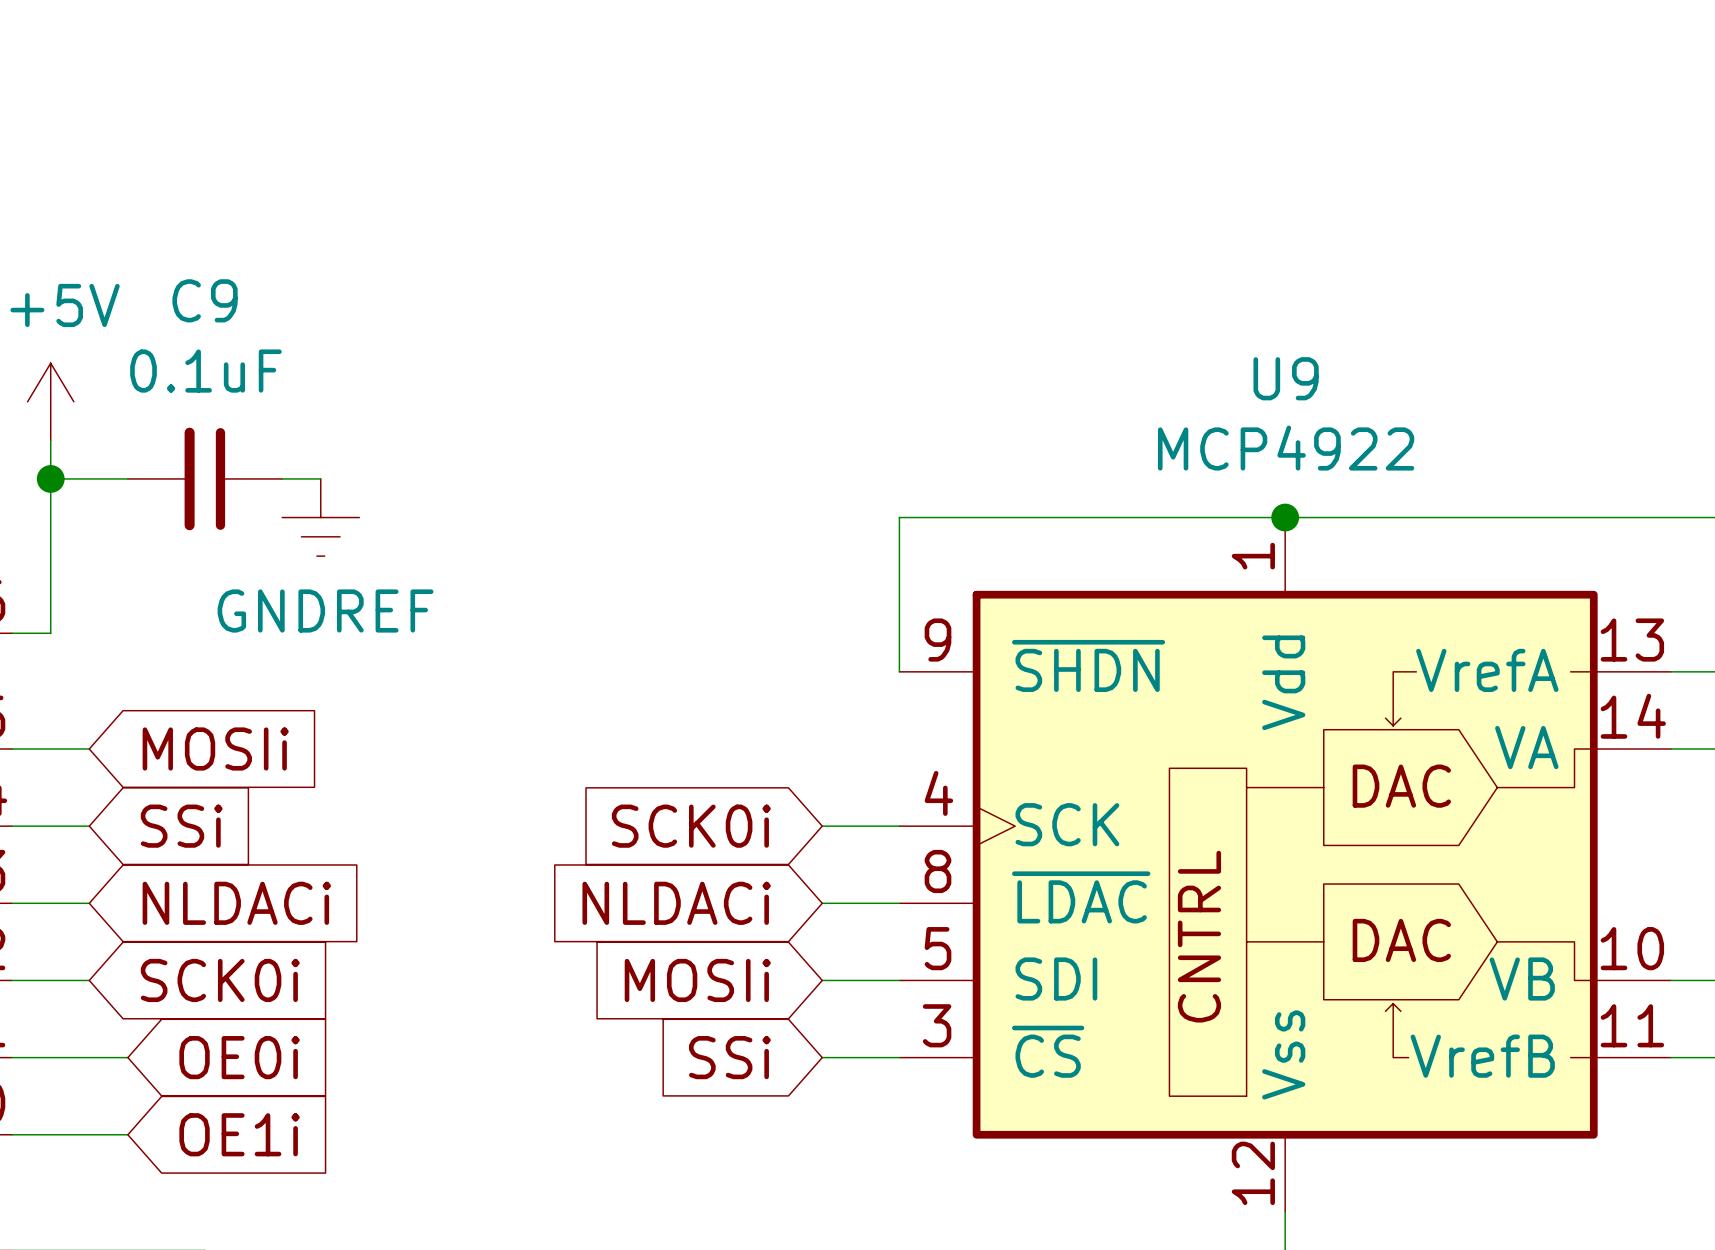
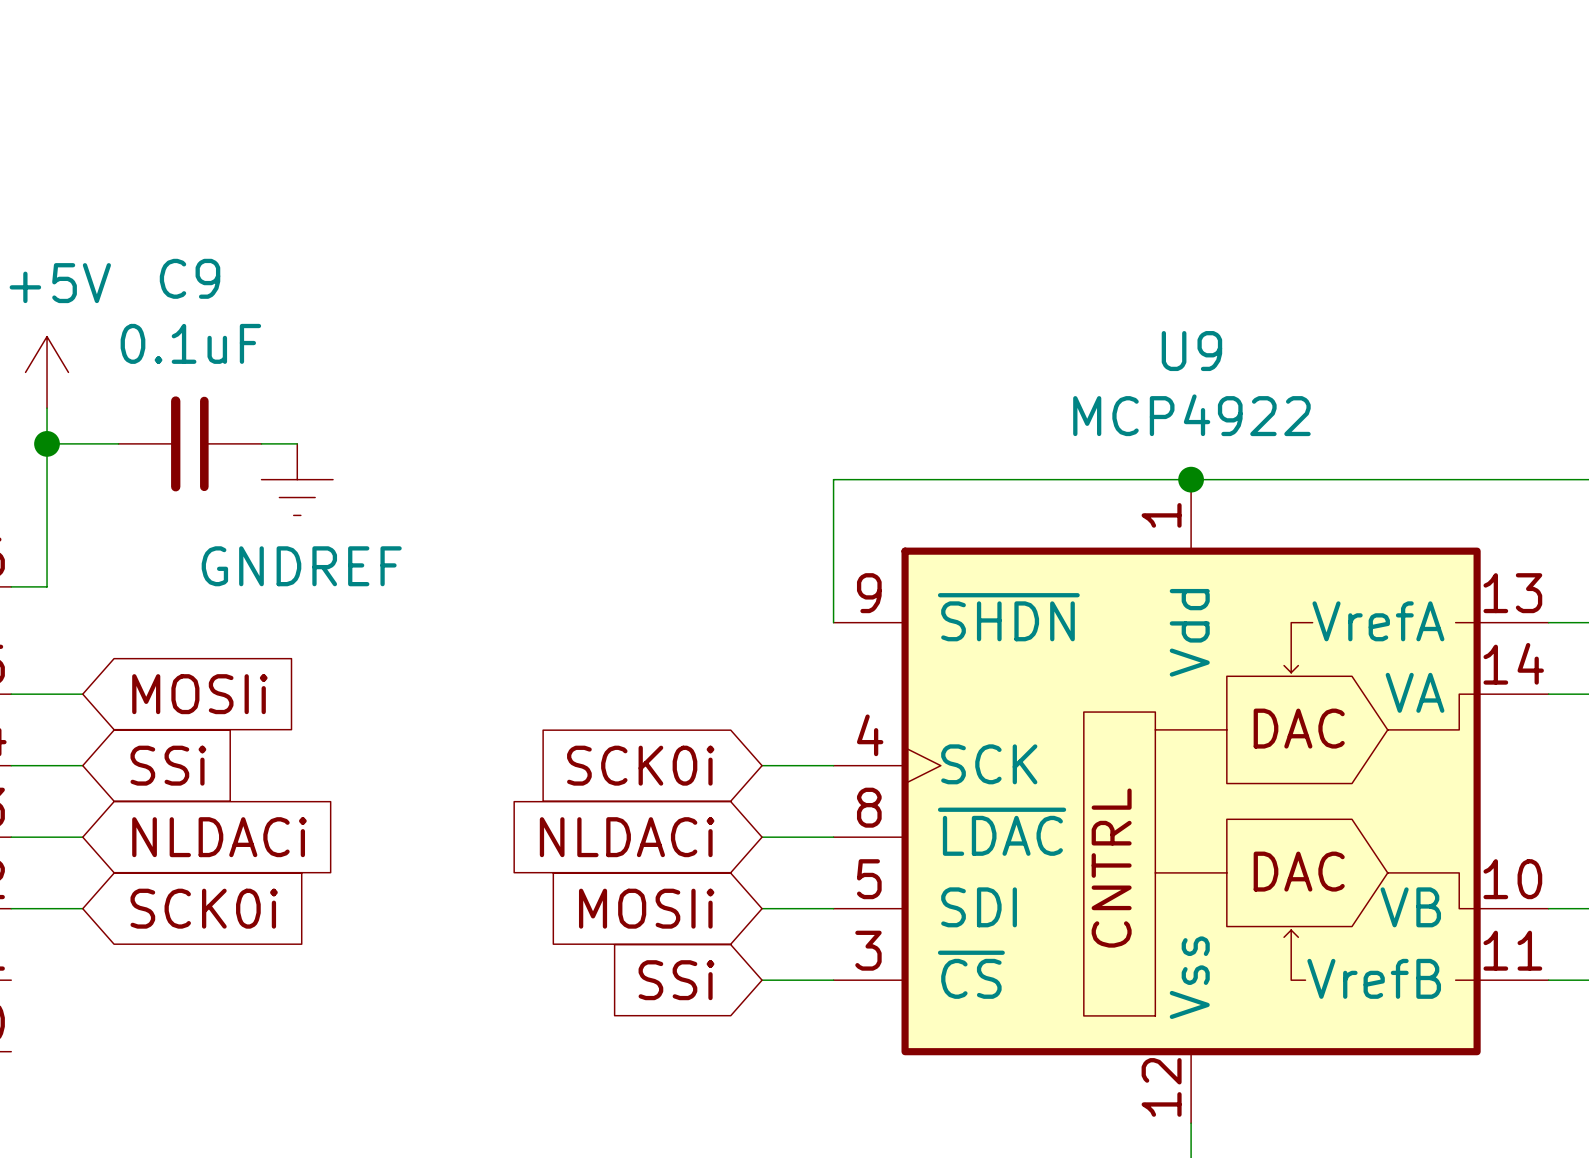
wire: (12, 1057) (127, 1057) -> none
global label: OE0i (239, 1057) -> none
wire: (12, 1134) (127, 1134) -> none
global label: OE1i (239, 1134) -> none

